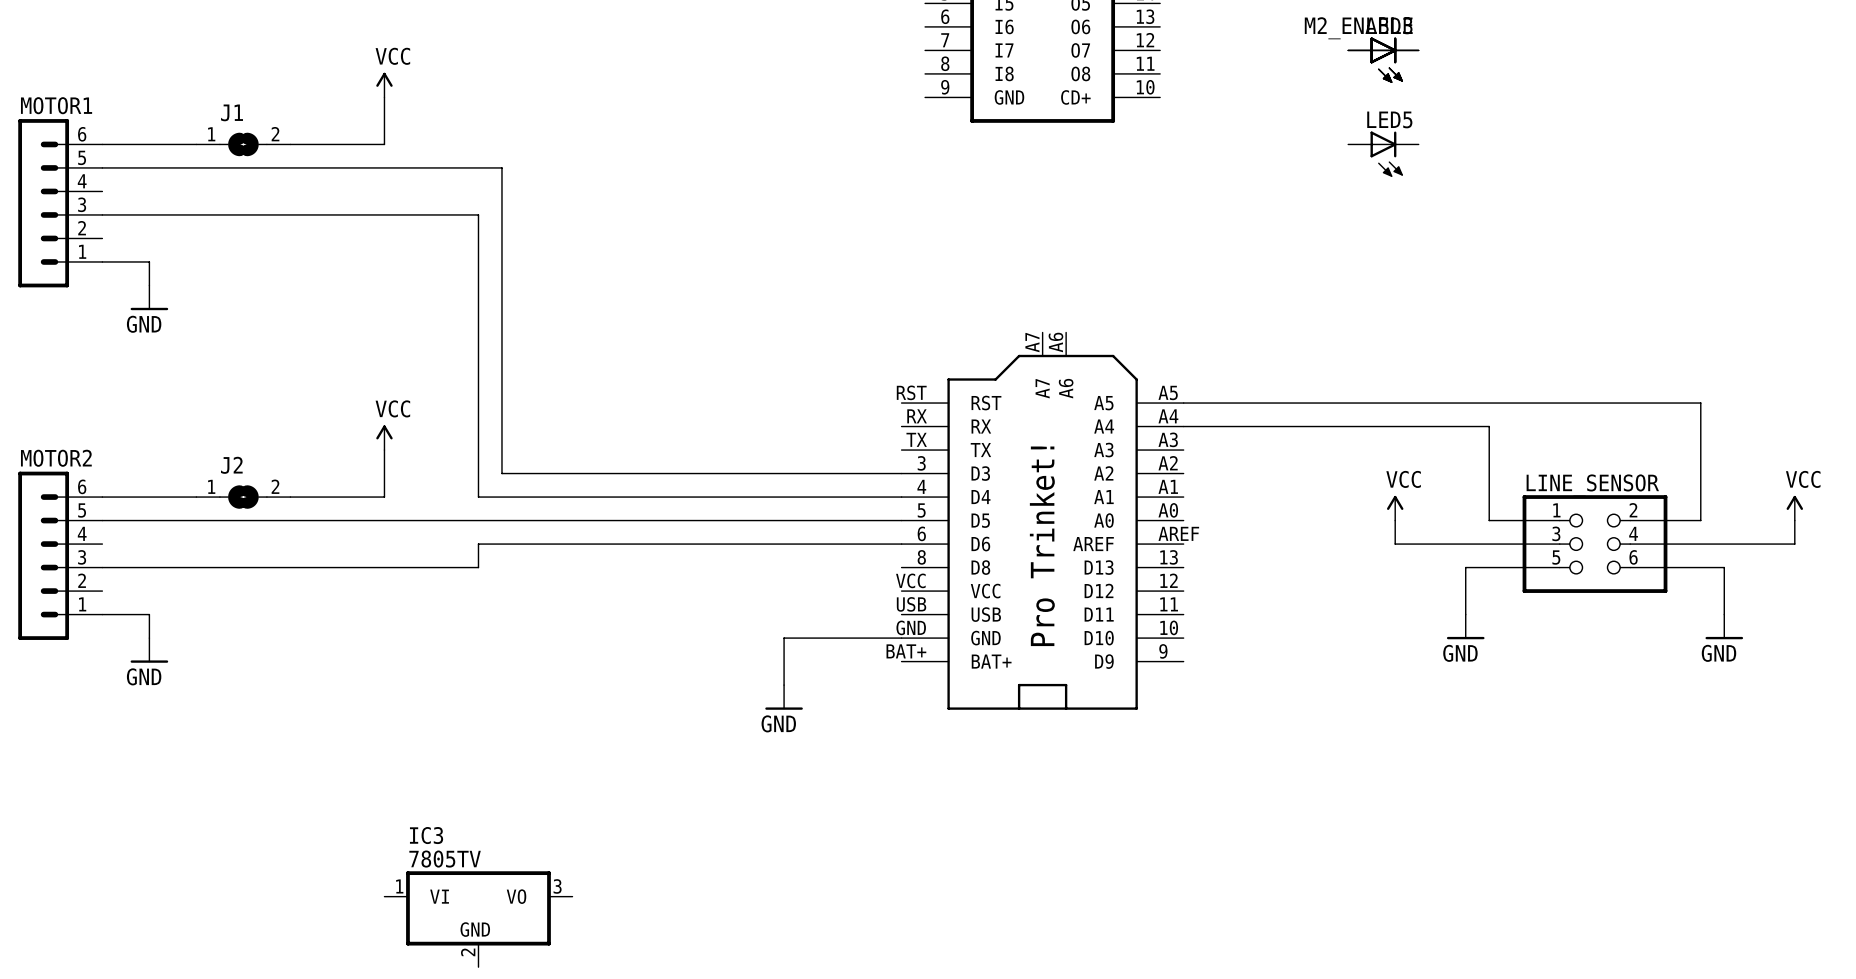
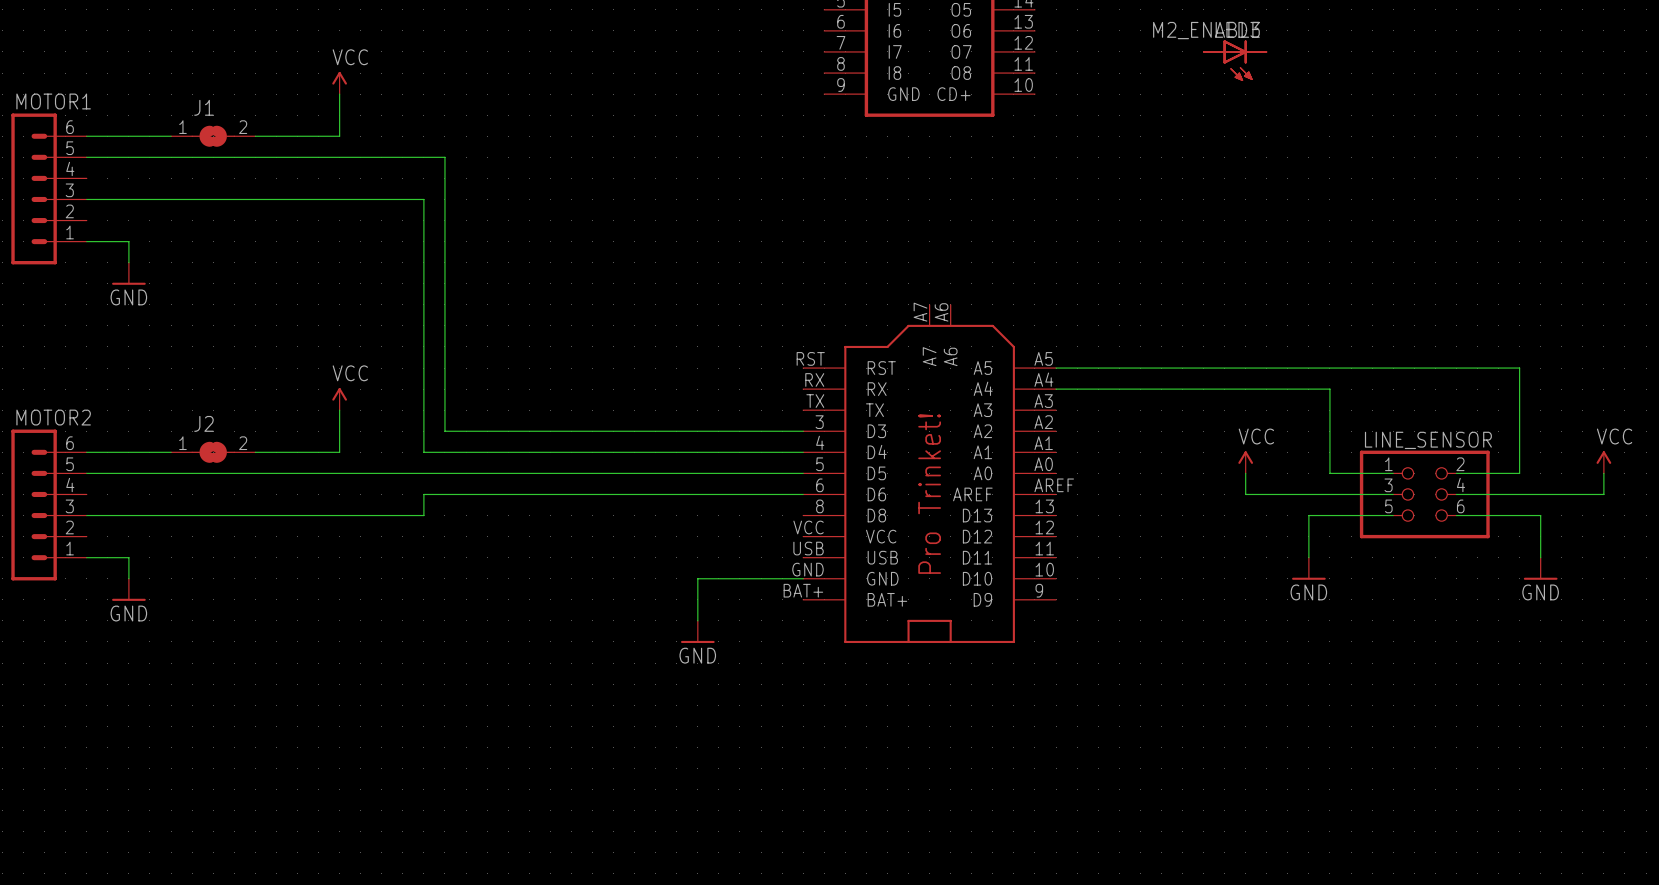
LED5: (1383, 154) -> none
IC3: 7805TV (478, 919) -> none

